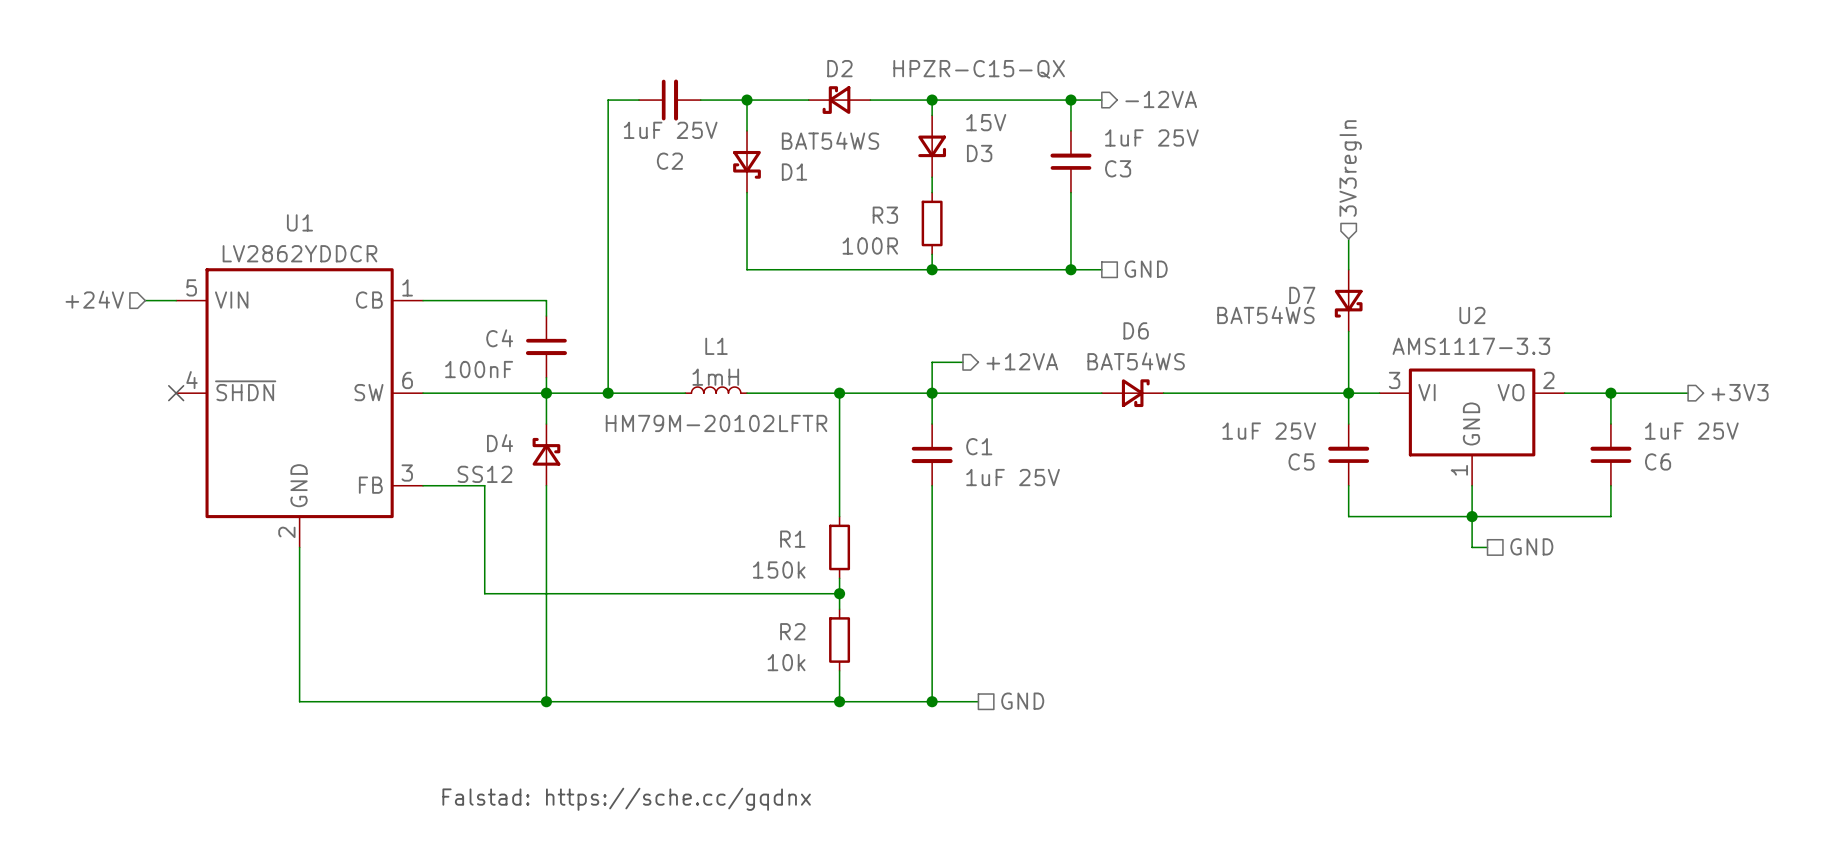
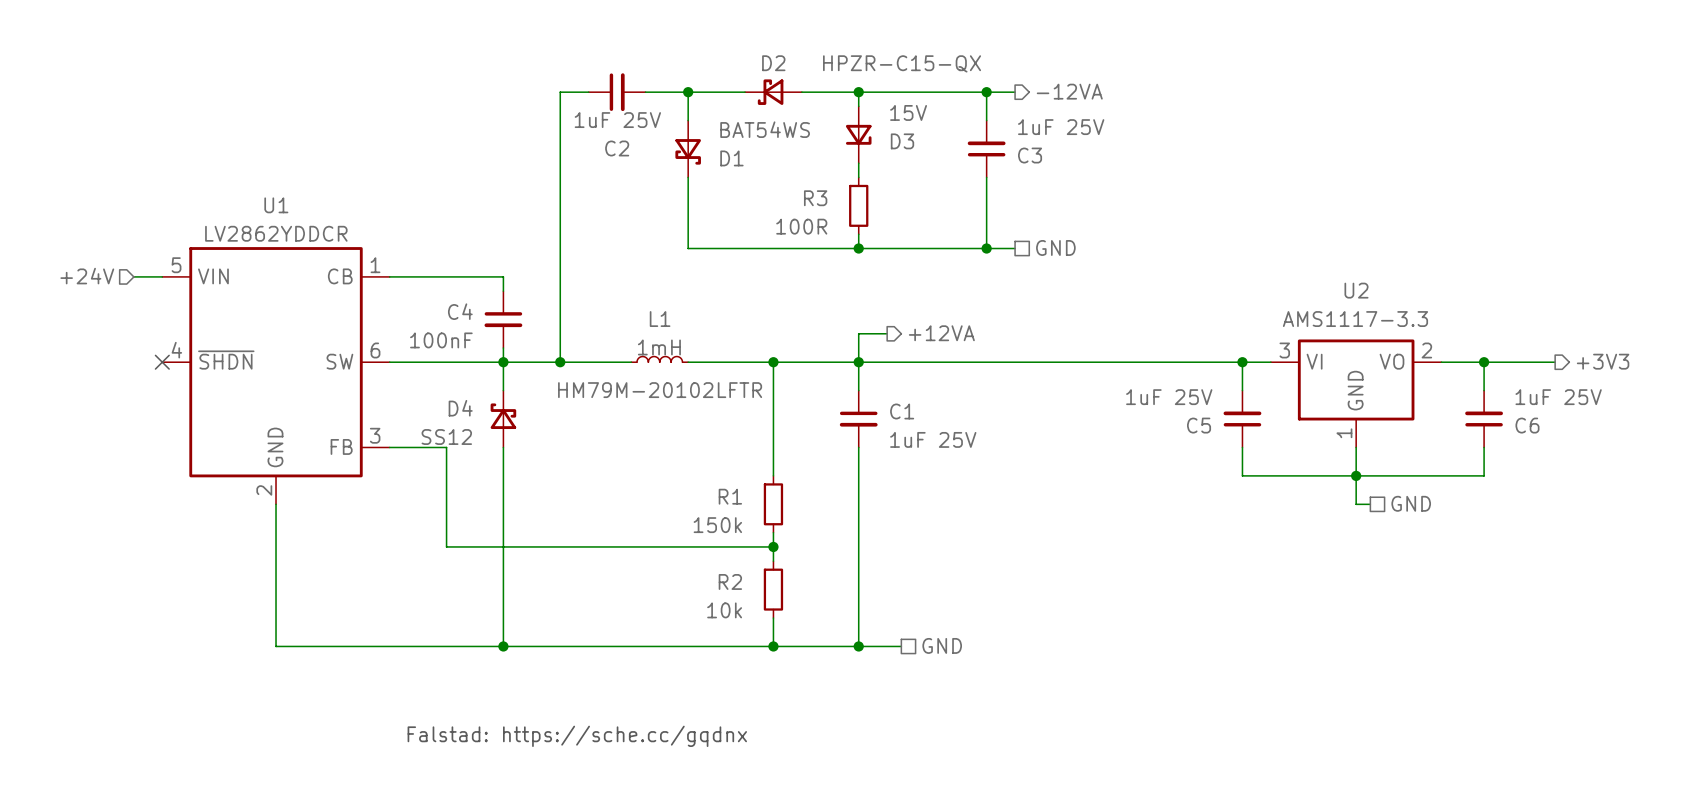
hierarchical label: 3V3regIn (1350, 168) -> none
wire: (1348, 238) (1348, 269) -> none
D7: BAT54WS (1348, 300) -> none
wire: (1348, 331) (1348, 393) -> none
D6: BAT54WS (1132, 393) -> none

